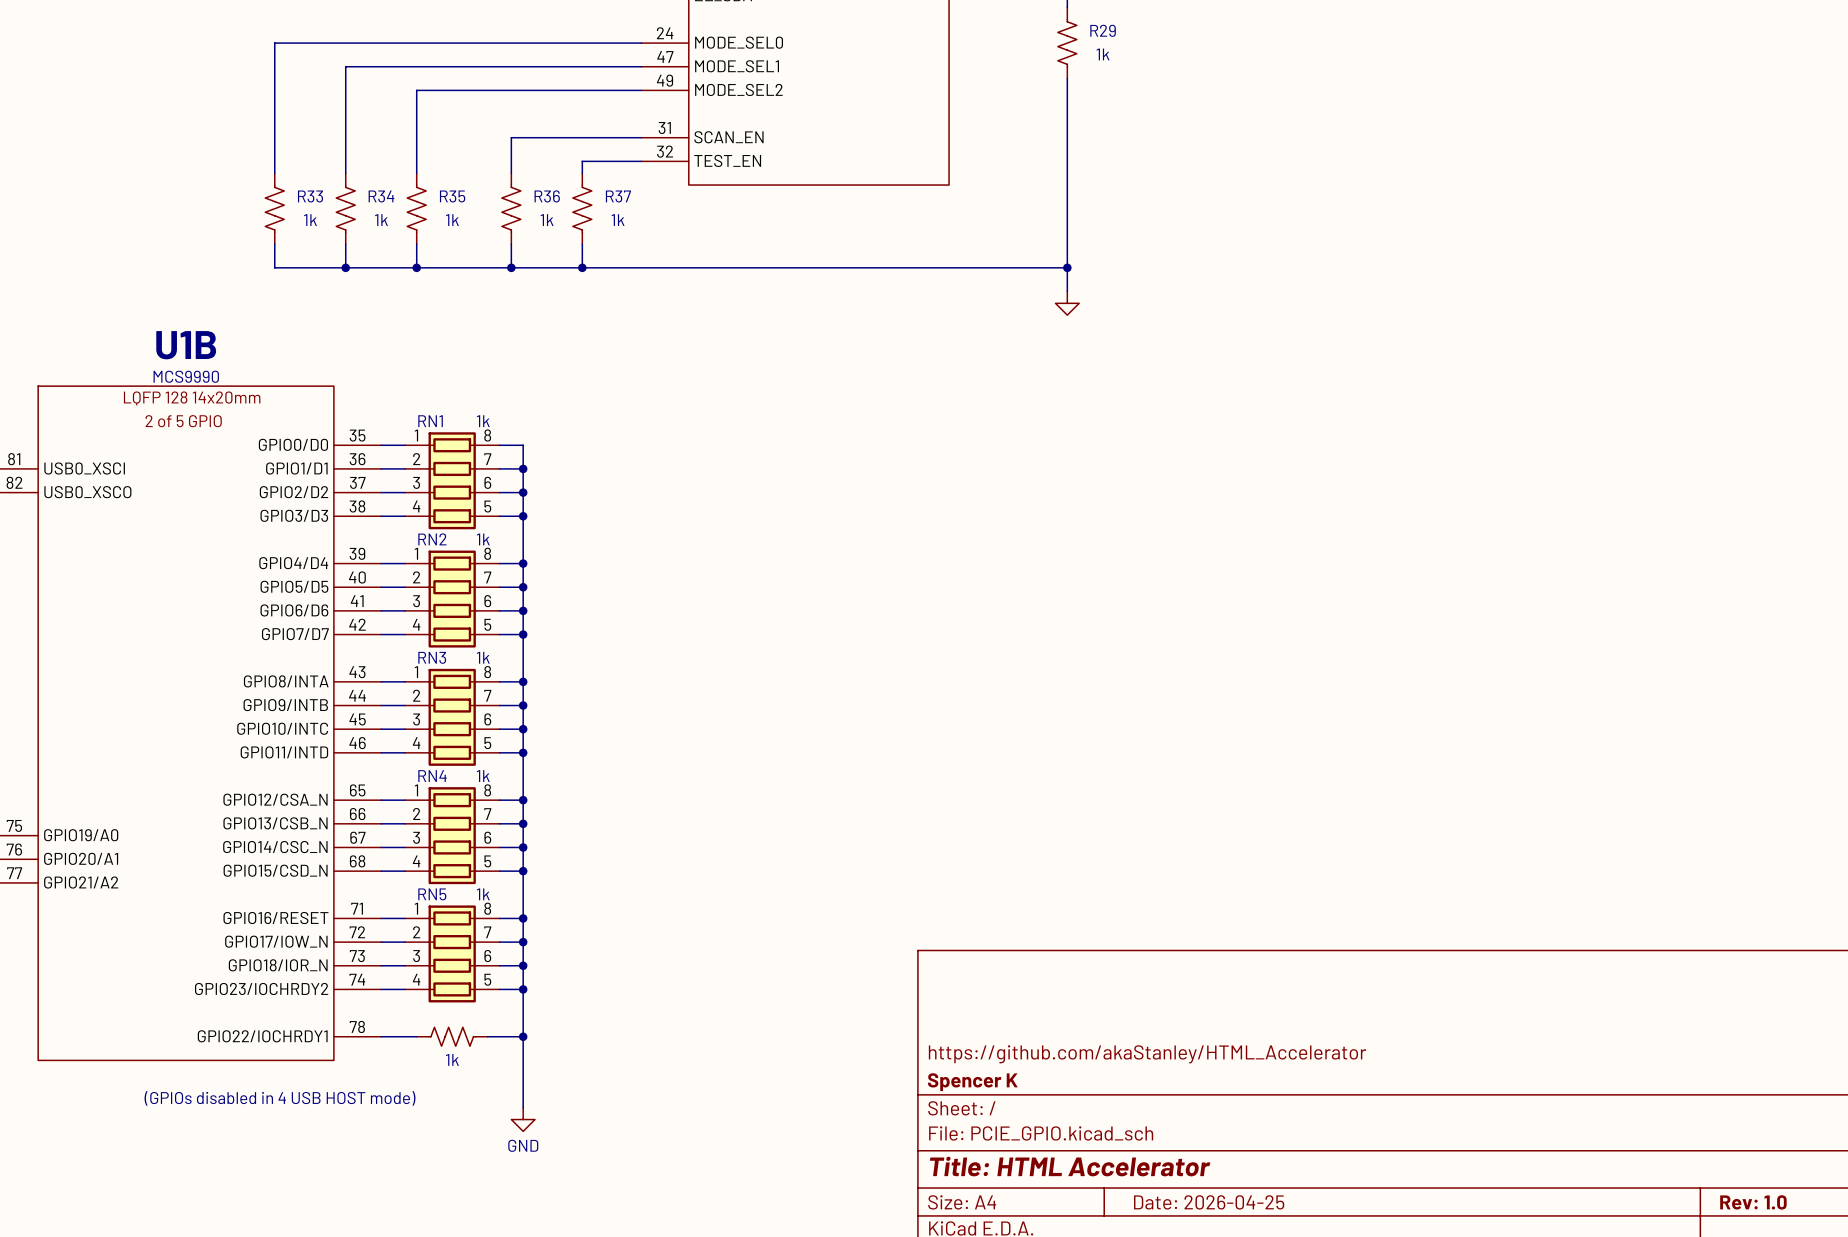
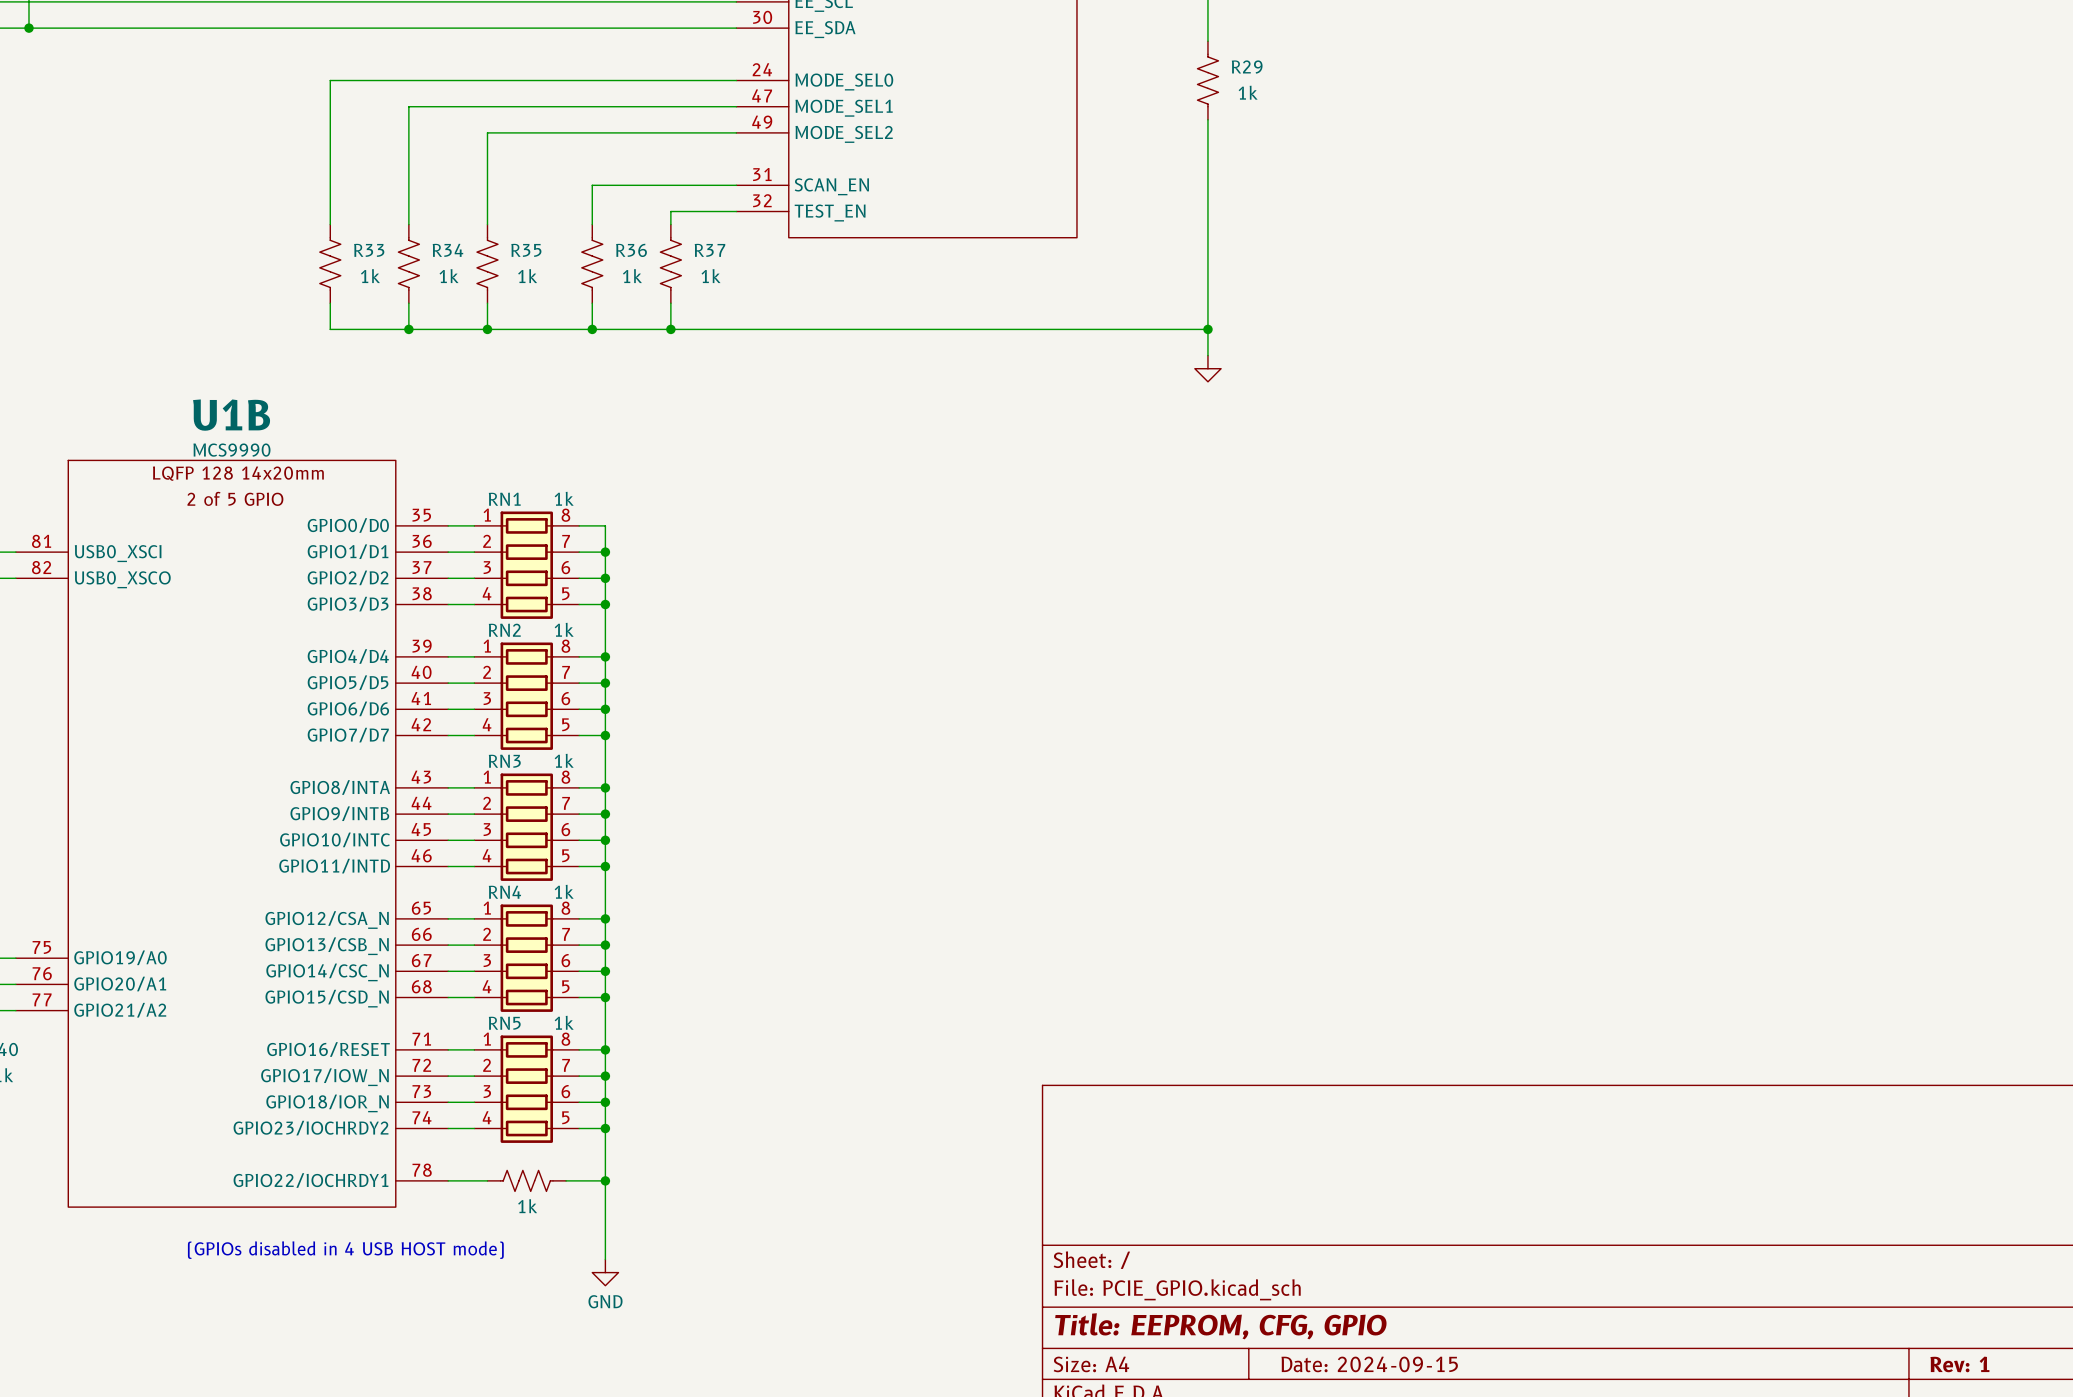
title block: https://github.com/akaStanley/HTML_Accelerator (1147, 1054) -> none
title block: Spencer K (972, 1082) -> none
title block: Title: HTML Accelerator (1070, 1166) -> Title: EEPROM, CFG, GPIO (1220, 1326)
title block: Date: 2026-04-25 (1209, 1202) -> Date: 2024-09-15 (1369, 1364)
title block: Rev: 1.0 (1753, 1202) -> Rev: 1 (1959, 1364)

